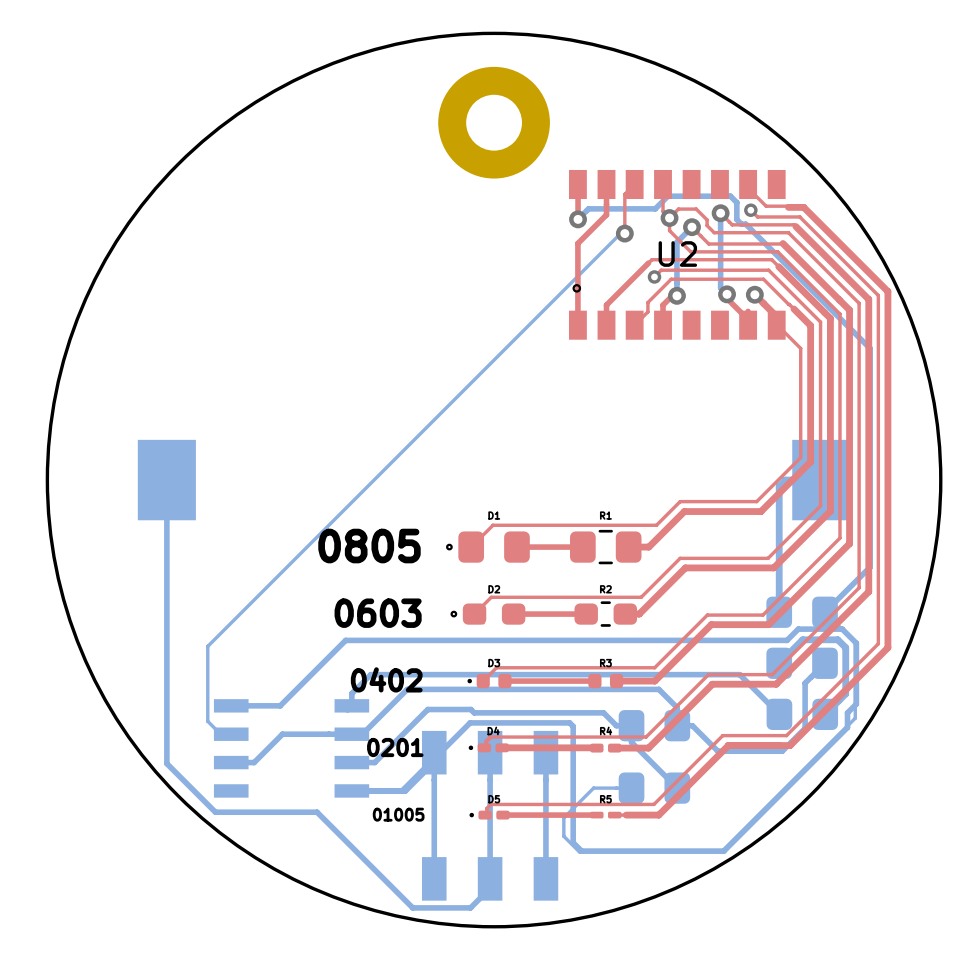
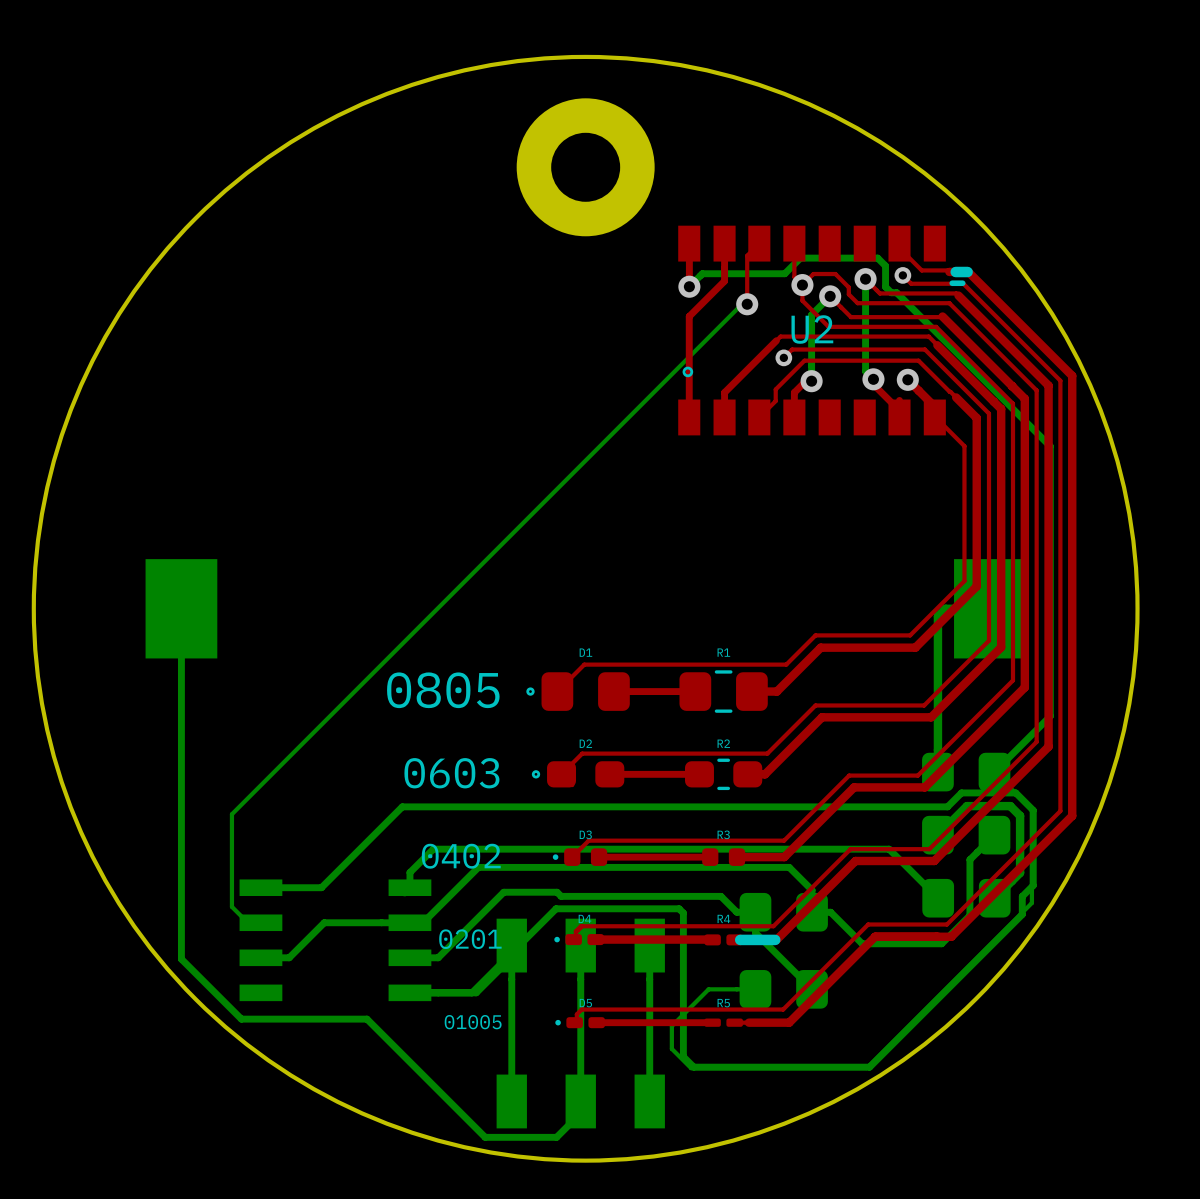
line: none -> (955, 272) (967, 272)
line: none -> (952, 283) (962, 283)
line: none -> (740, 939) (775, 939)

